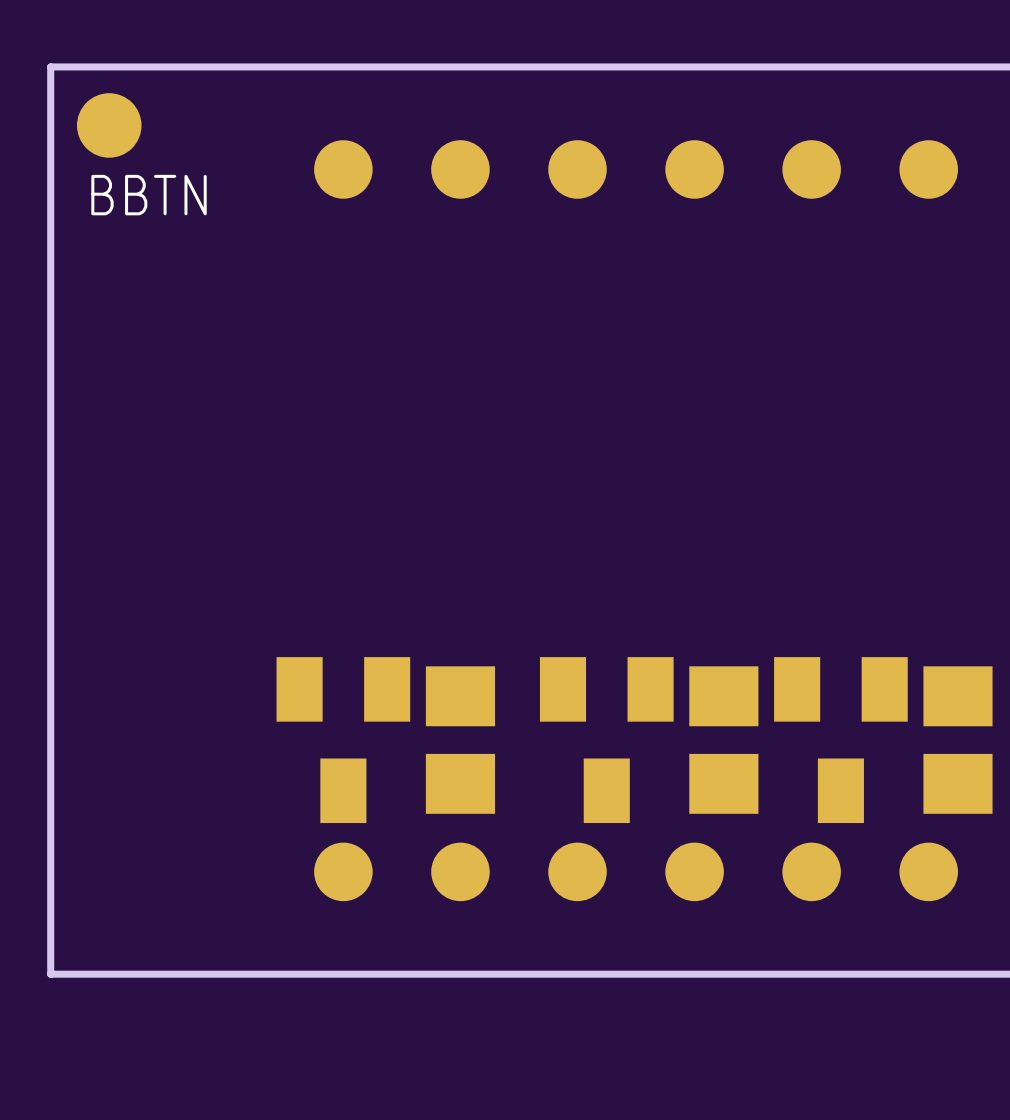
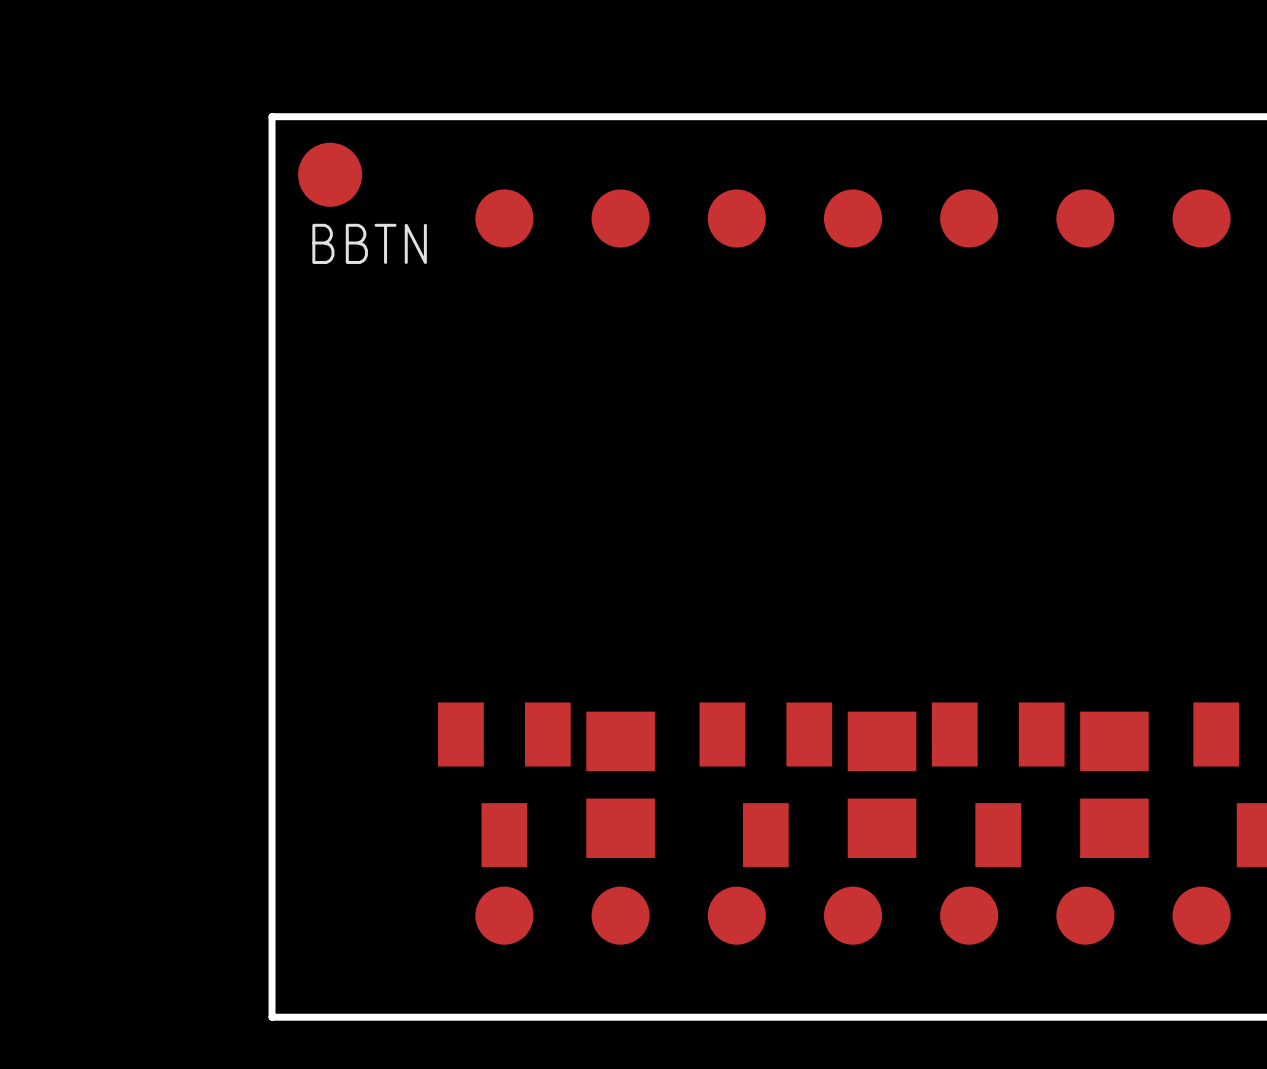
board edge: (109, 66) (50, 66) (50, 974) (109, 974) -> (272, 116) (272, 1017)
BBTN position: (109, 125) -> (330, 174)

